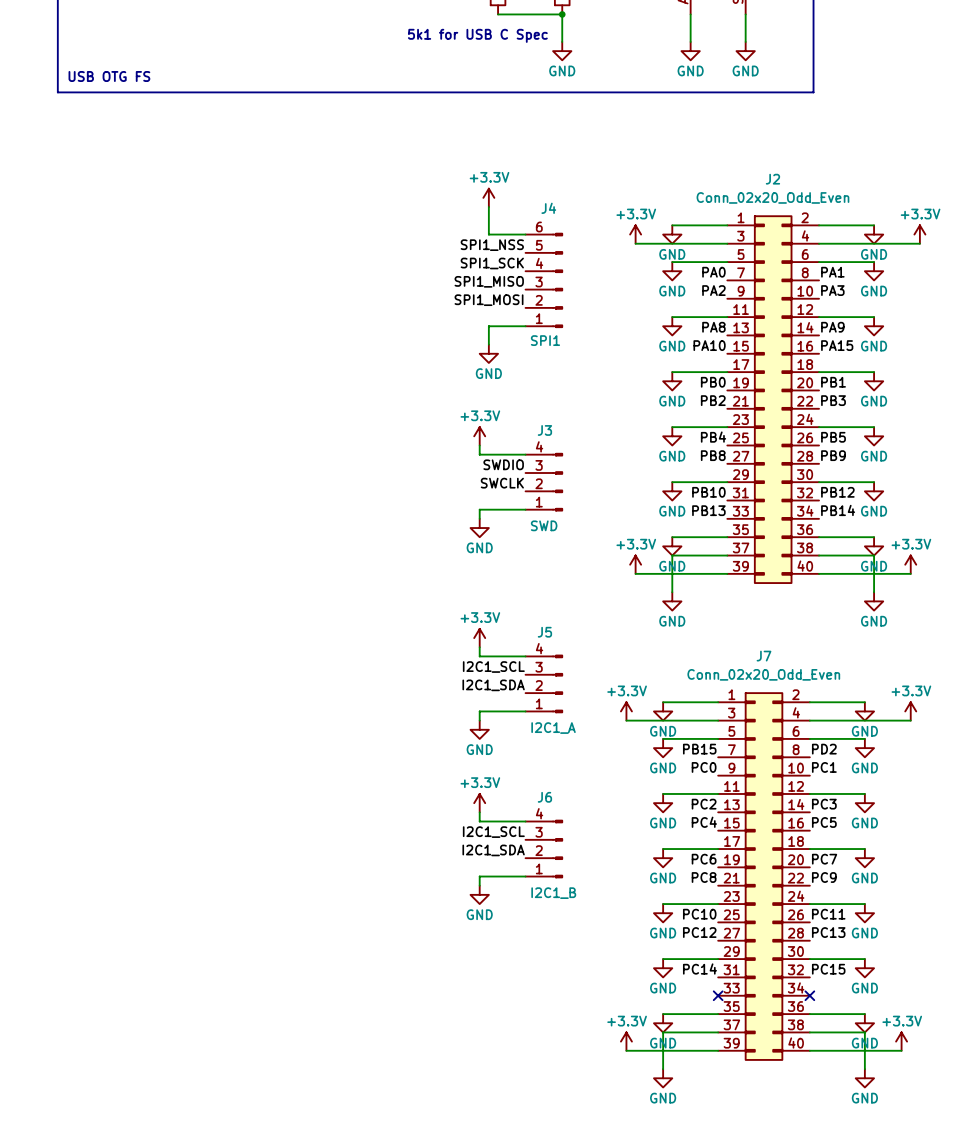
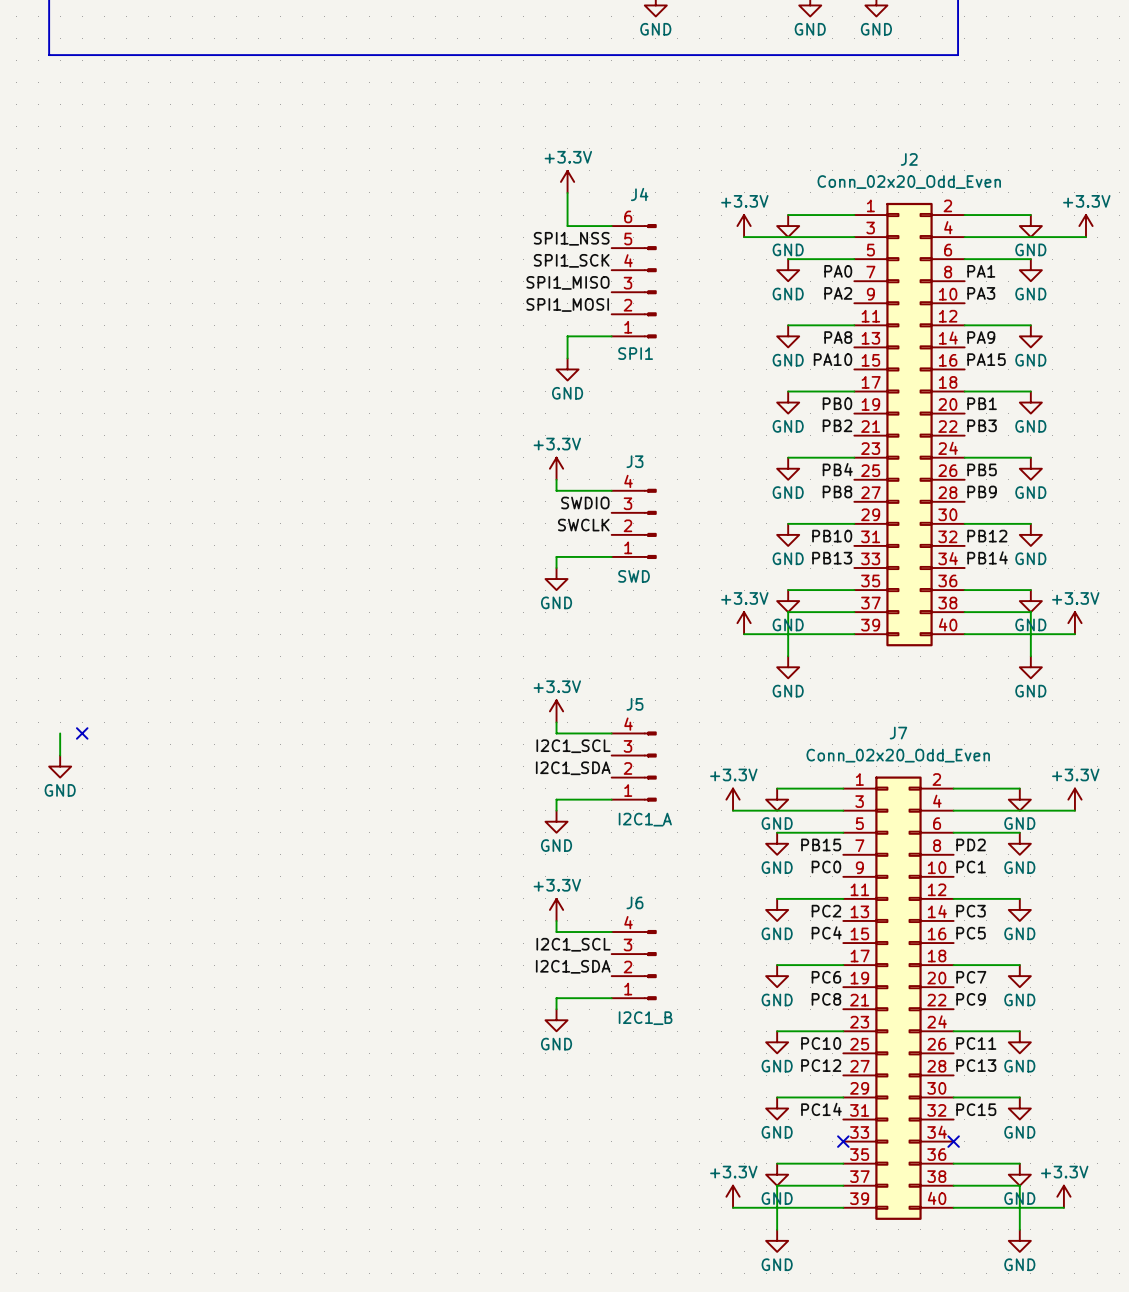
text: USB OTG FS (109, 76) -> none
wire: none -> (60, 733) (60, 755)
no-connect mark: none -> (82, 733)
power symbol: none -> GND (60, 766)

